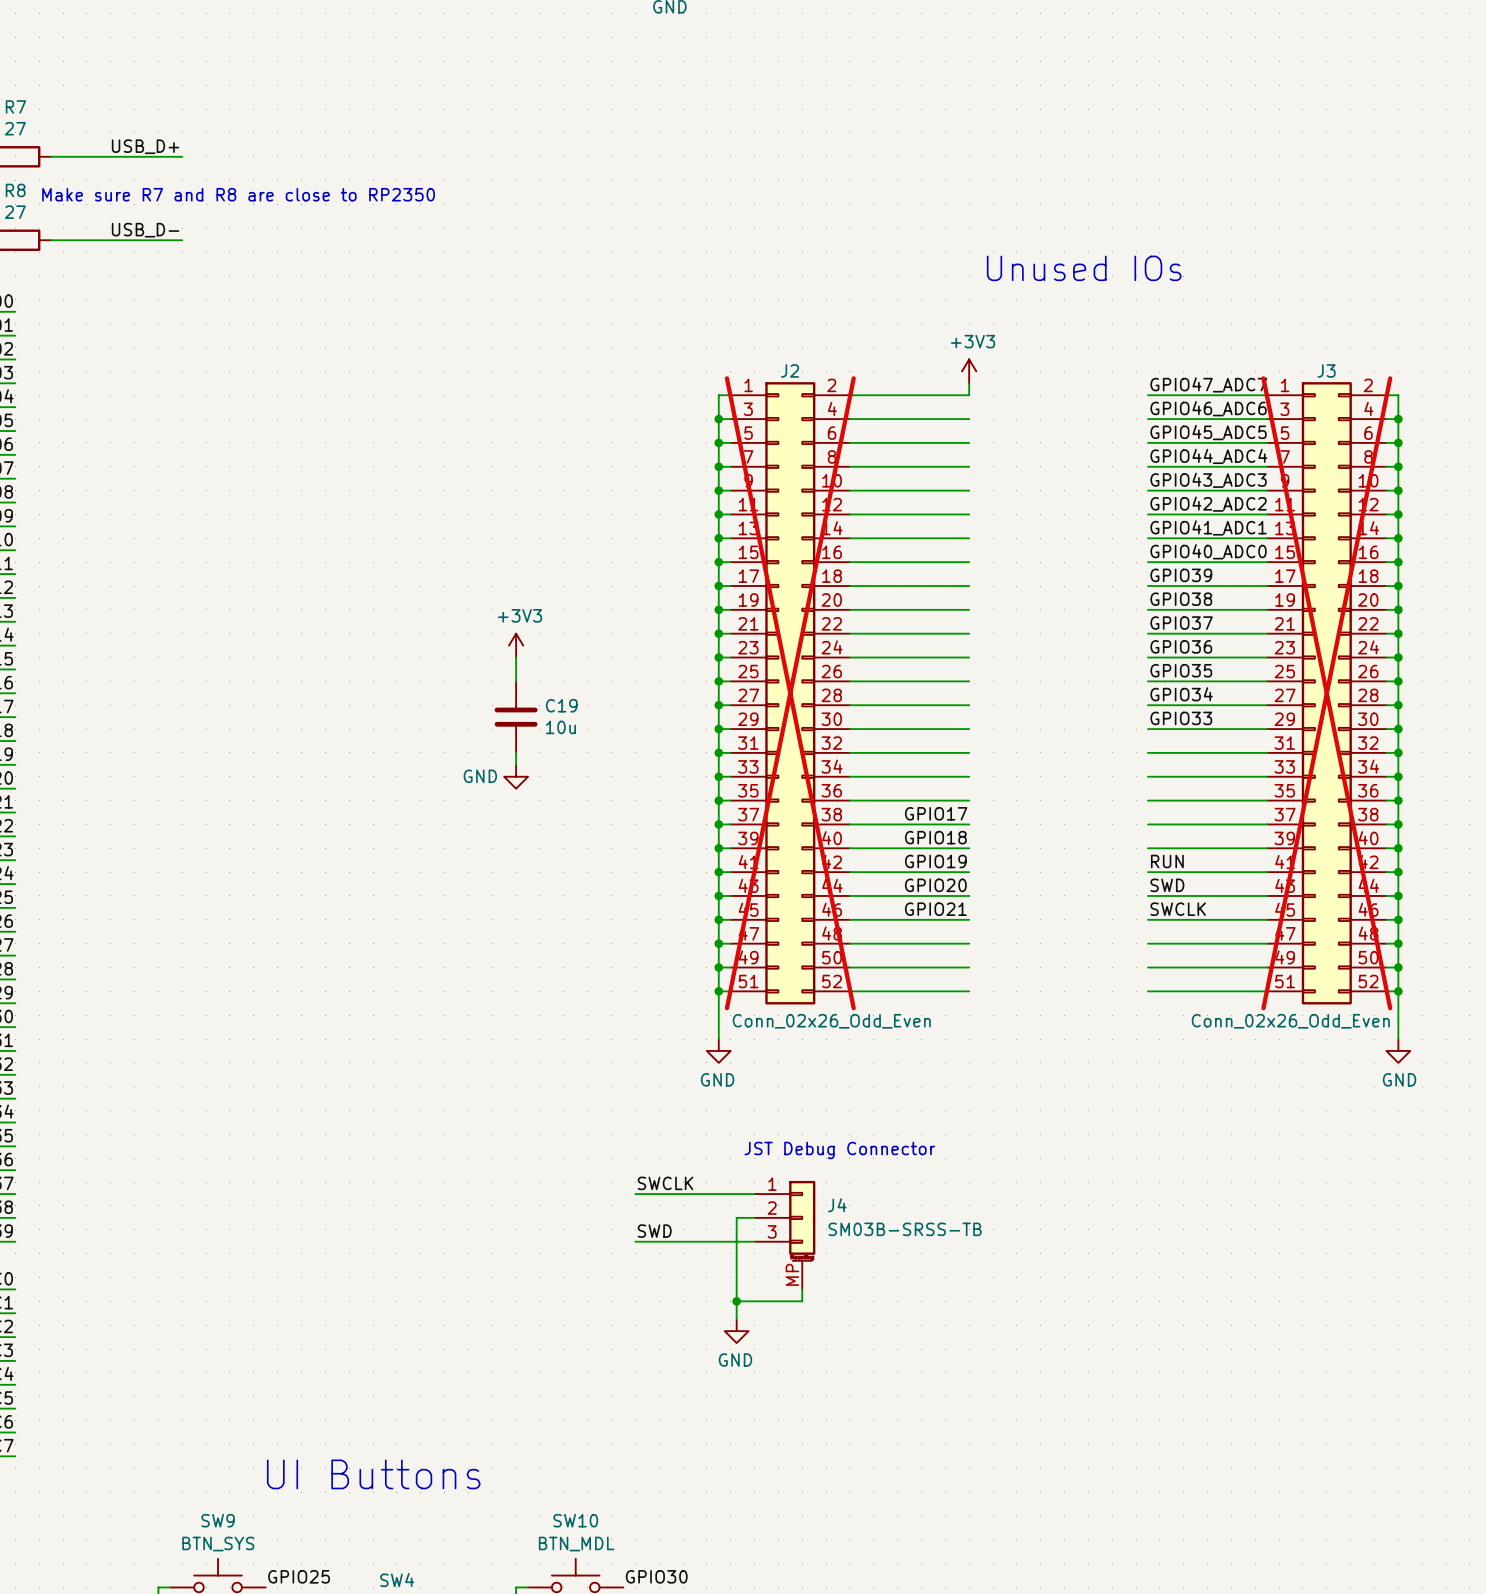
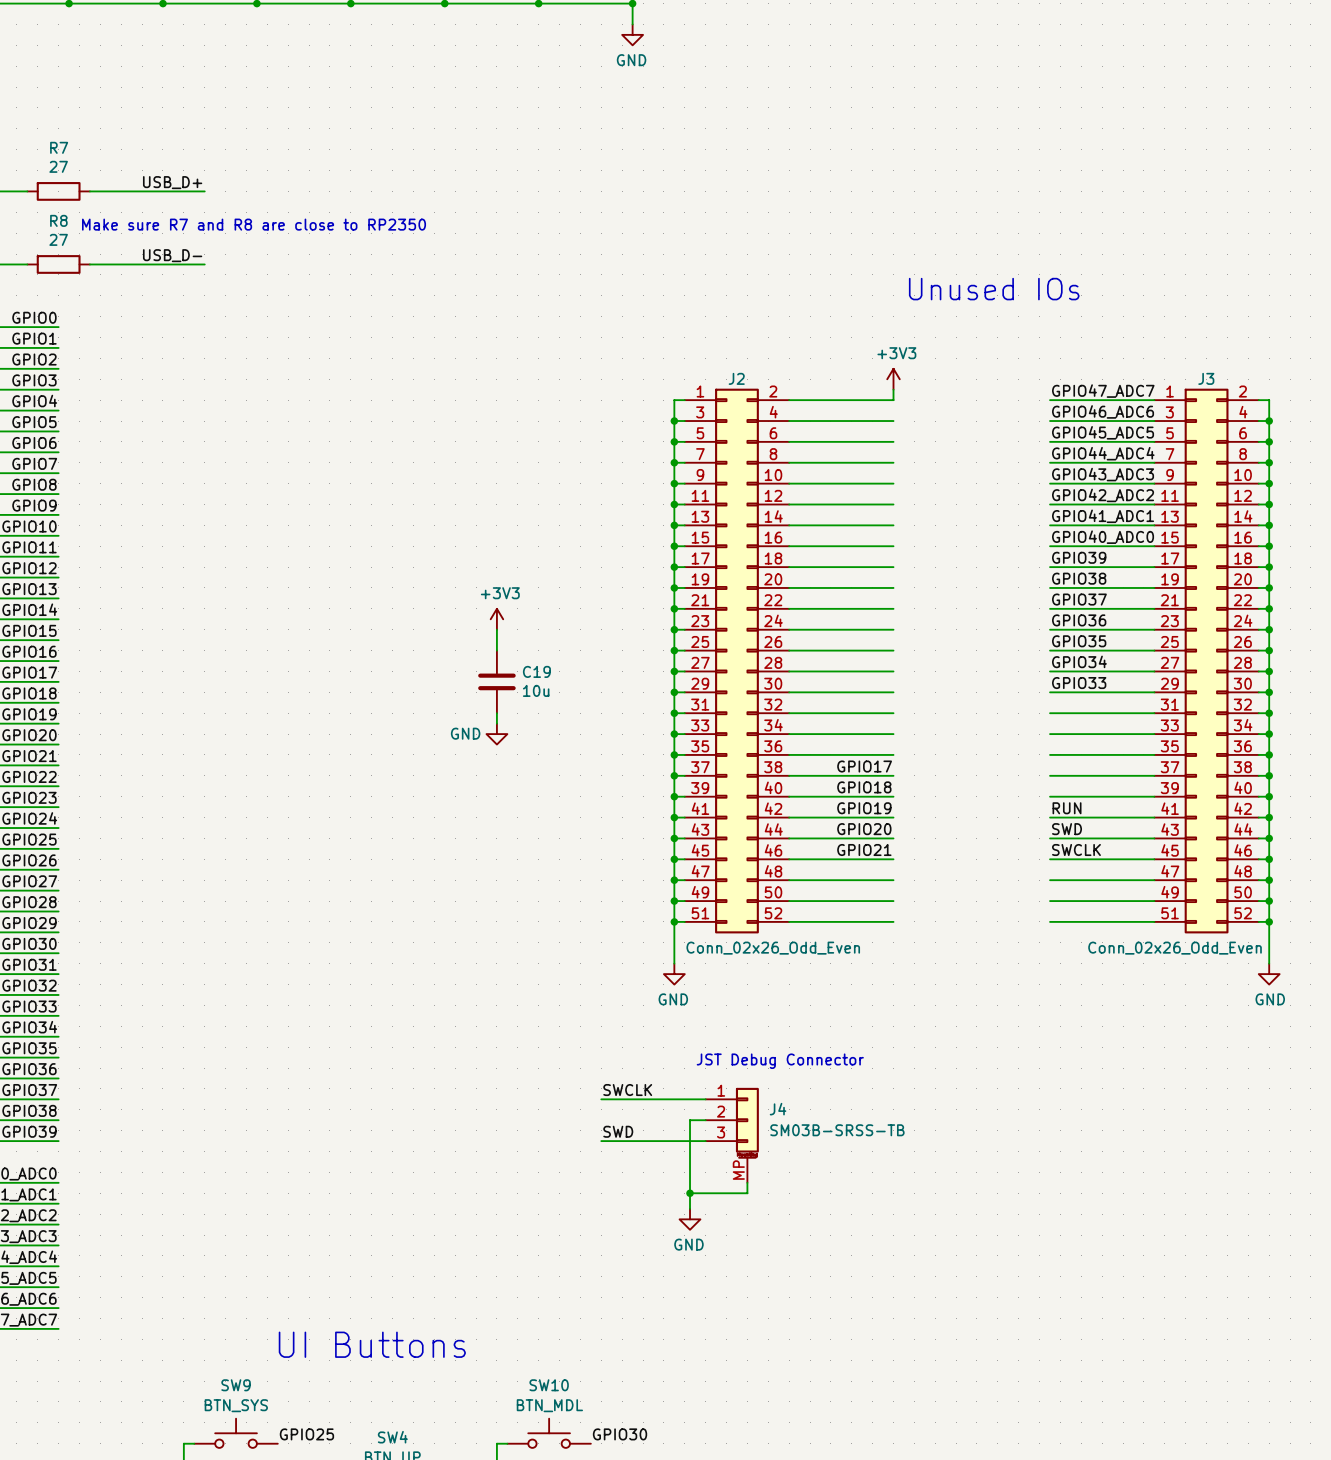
J2 do-not-place cross: (790, 693) -> none
J3 do-not-place cross: (1326, 693) -> none

